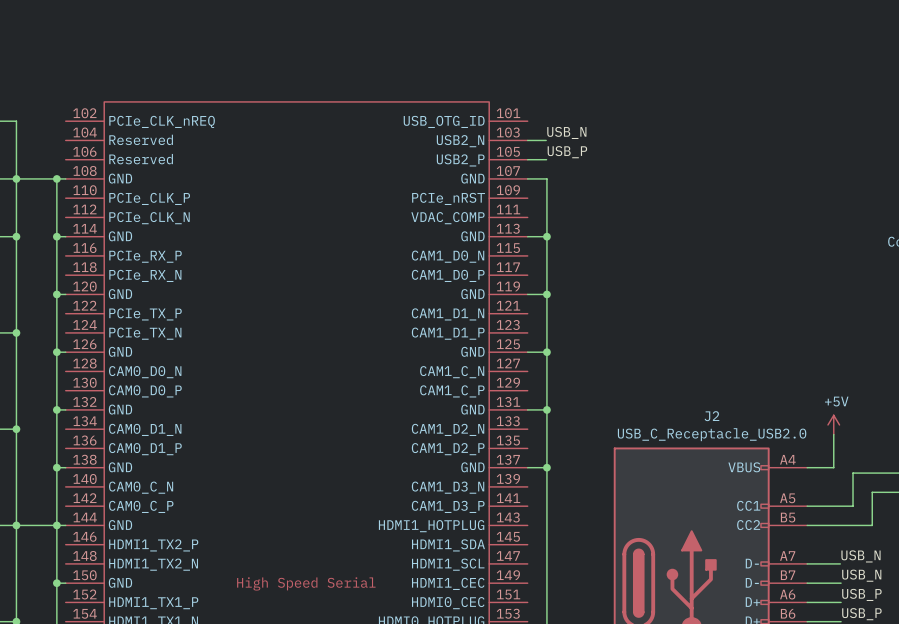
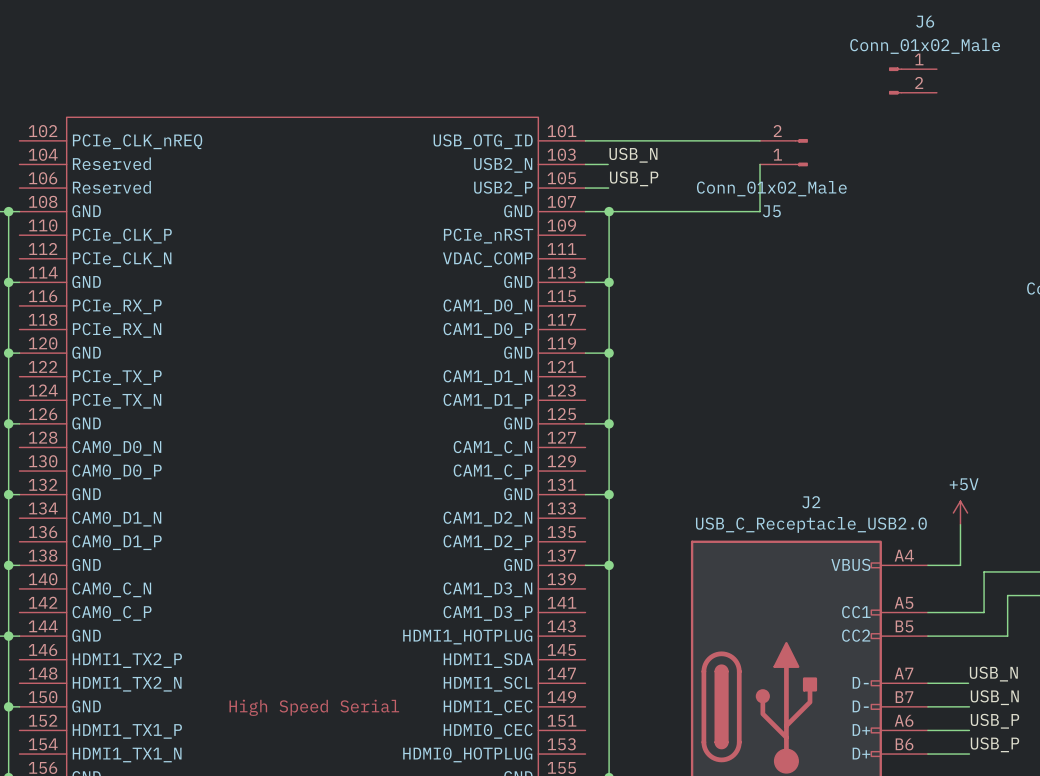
J6: none -> Conn_01x02_Male (912, 80)
wire: none -> (585, 140) (760, 140)
J5: none -> Conn_01x02_Male (783, 152)
wire: none -> (760, 164) (760, 211) (609, 211)
junction: none -> (609, 211)

